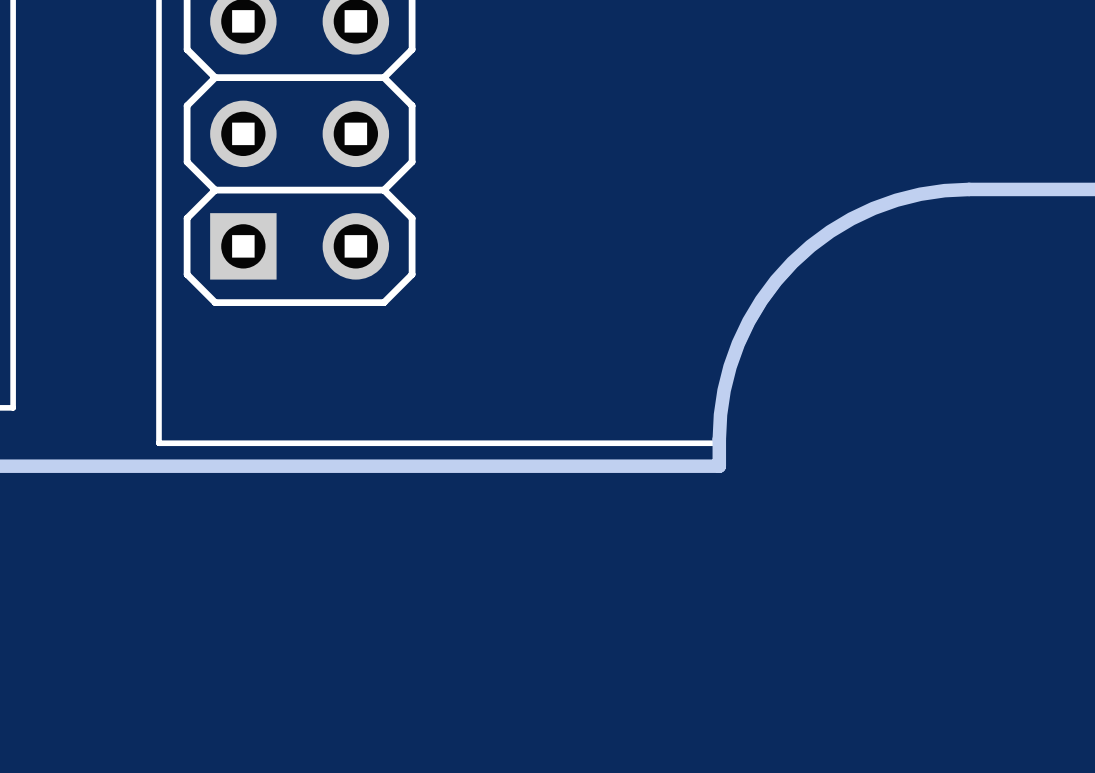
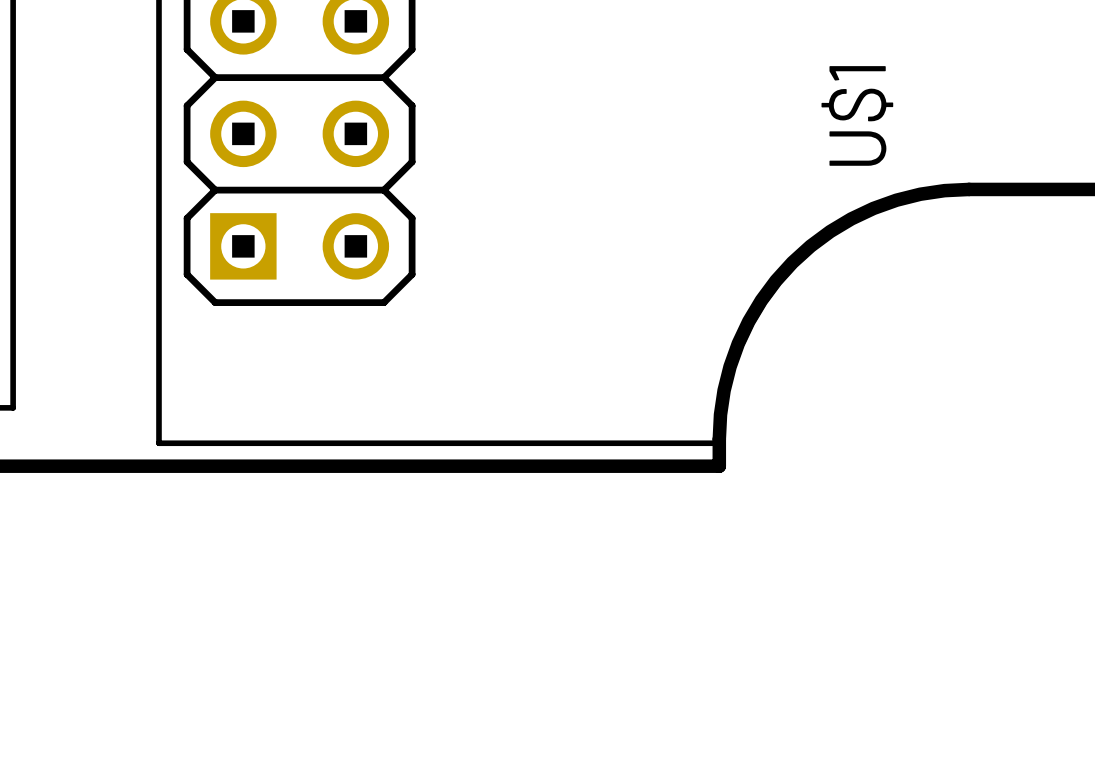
U$1 name: none -> U$1 (857, 115)

